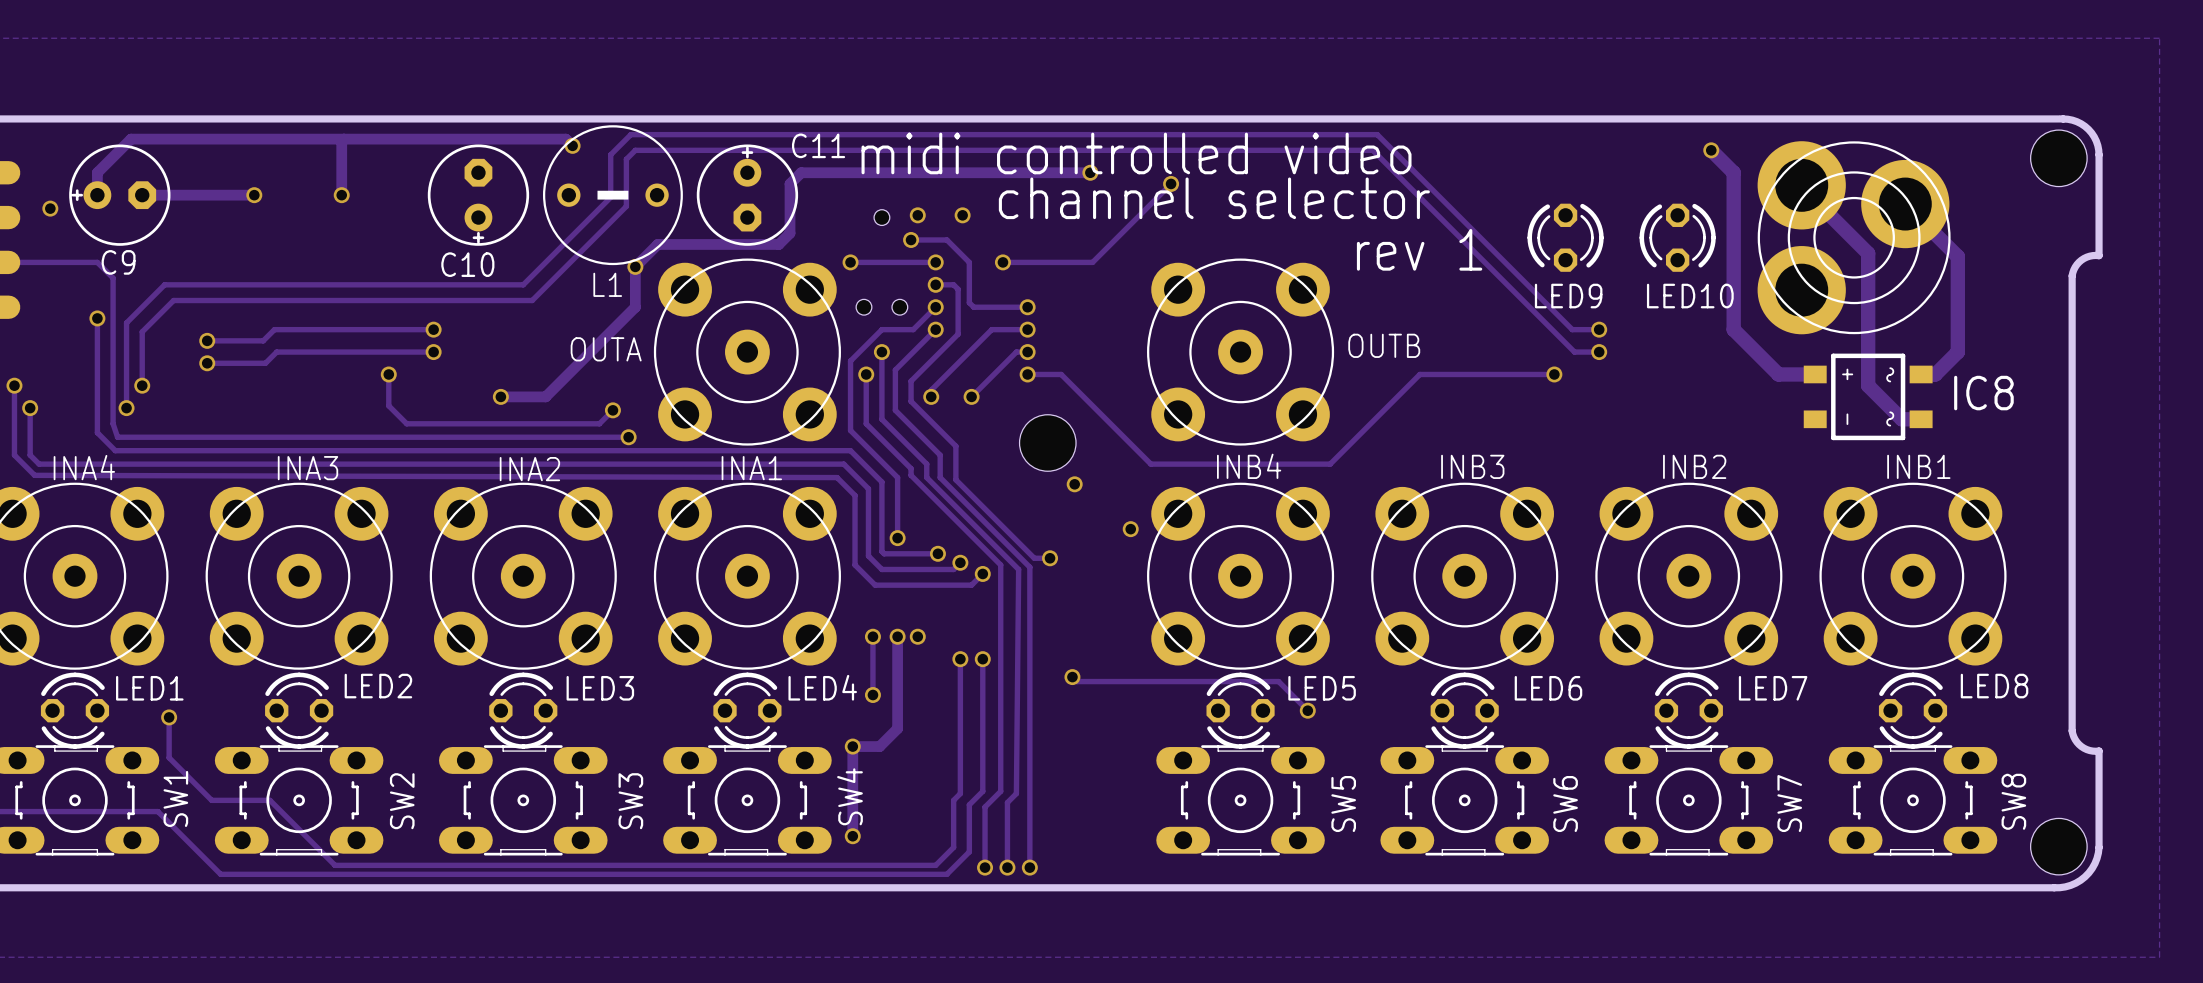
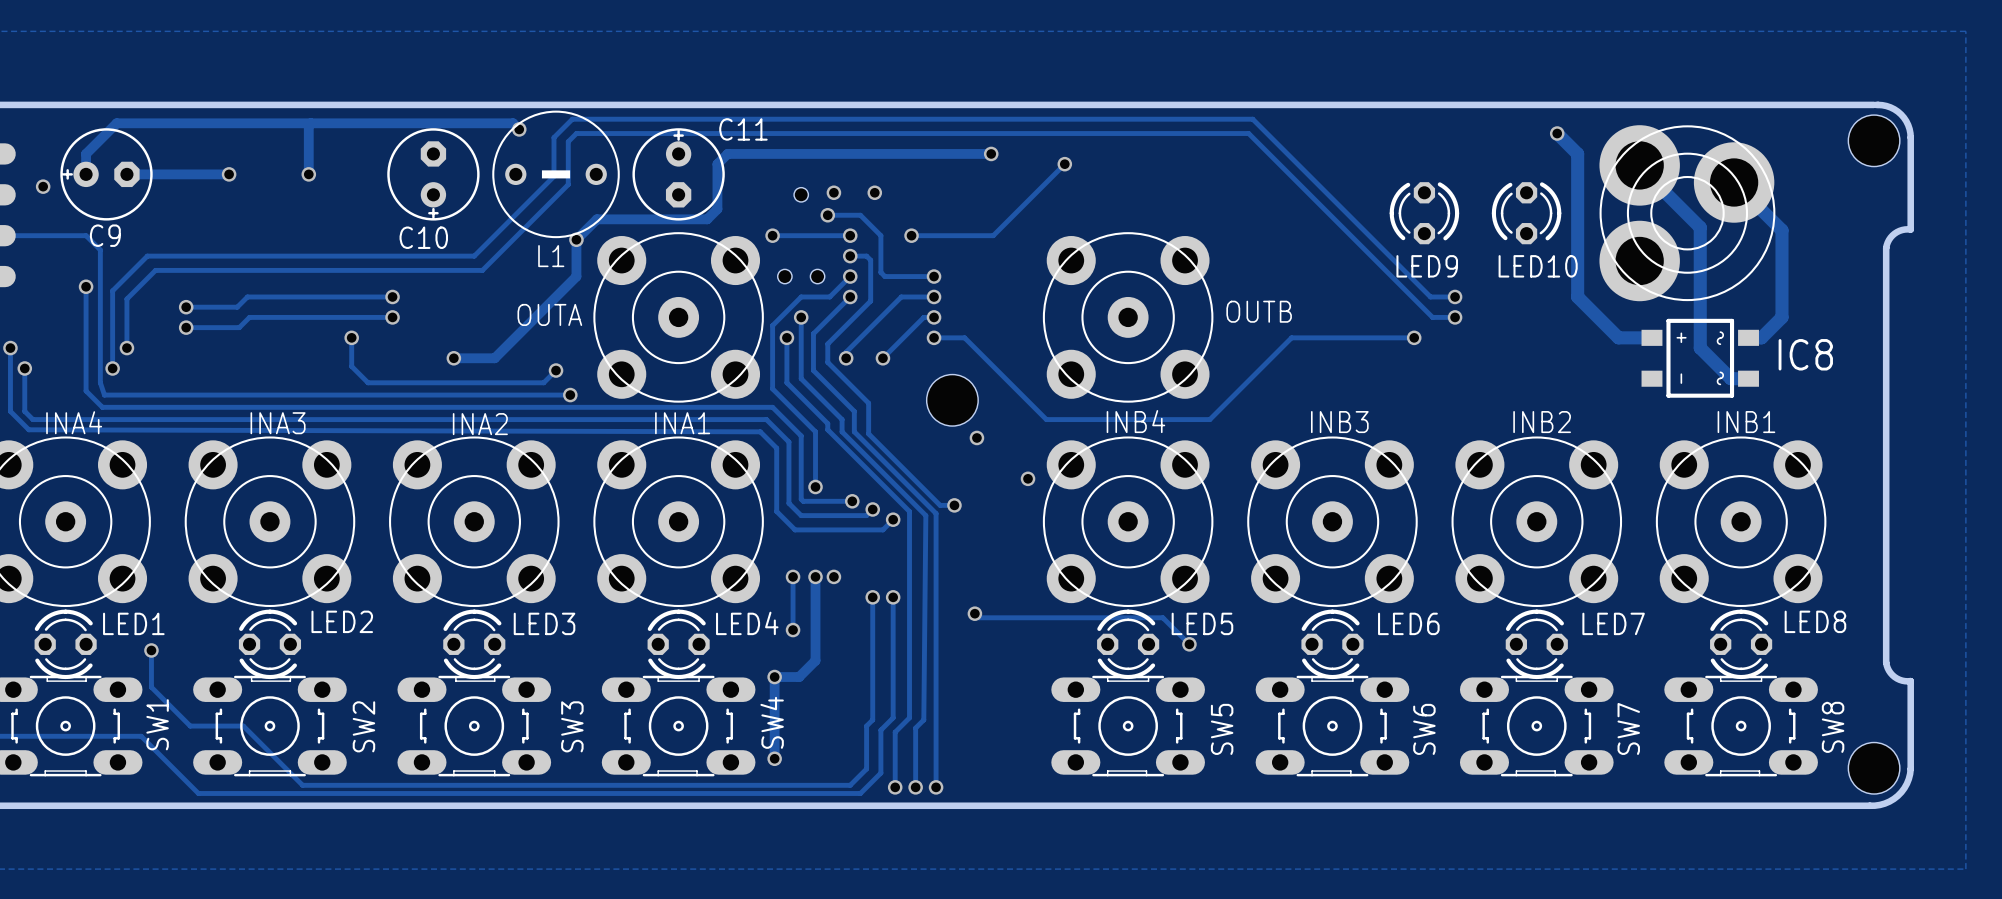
text: midi controlled video (1136, 153) -> none
text: channel selector (1214, 198) -> none
text: rev 1 (1419, 249) -> none

